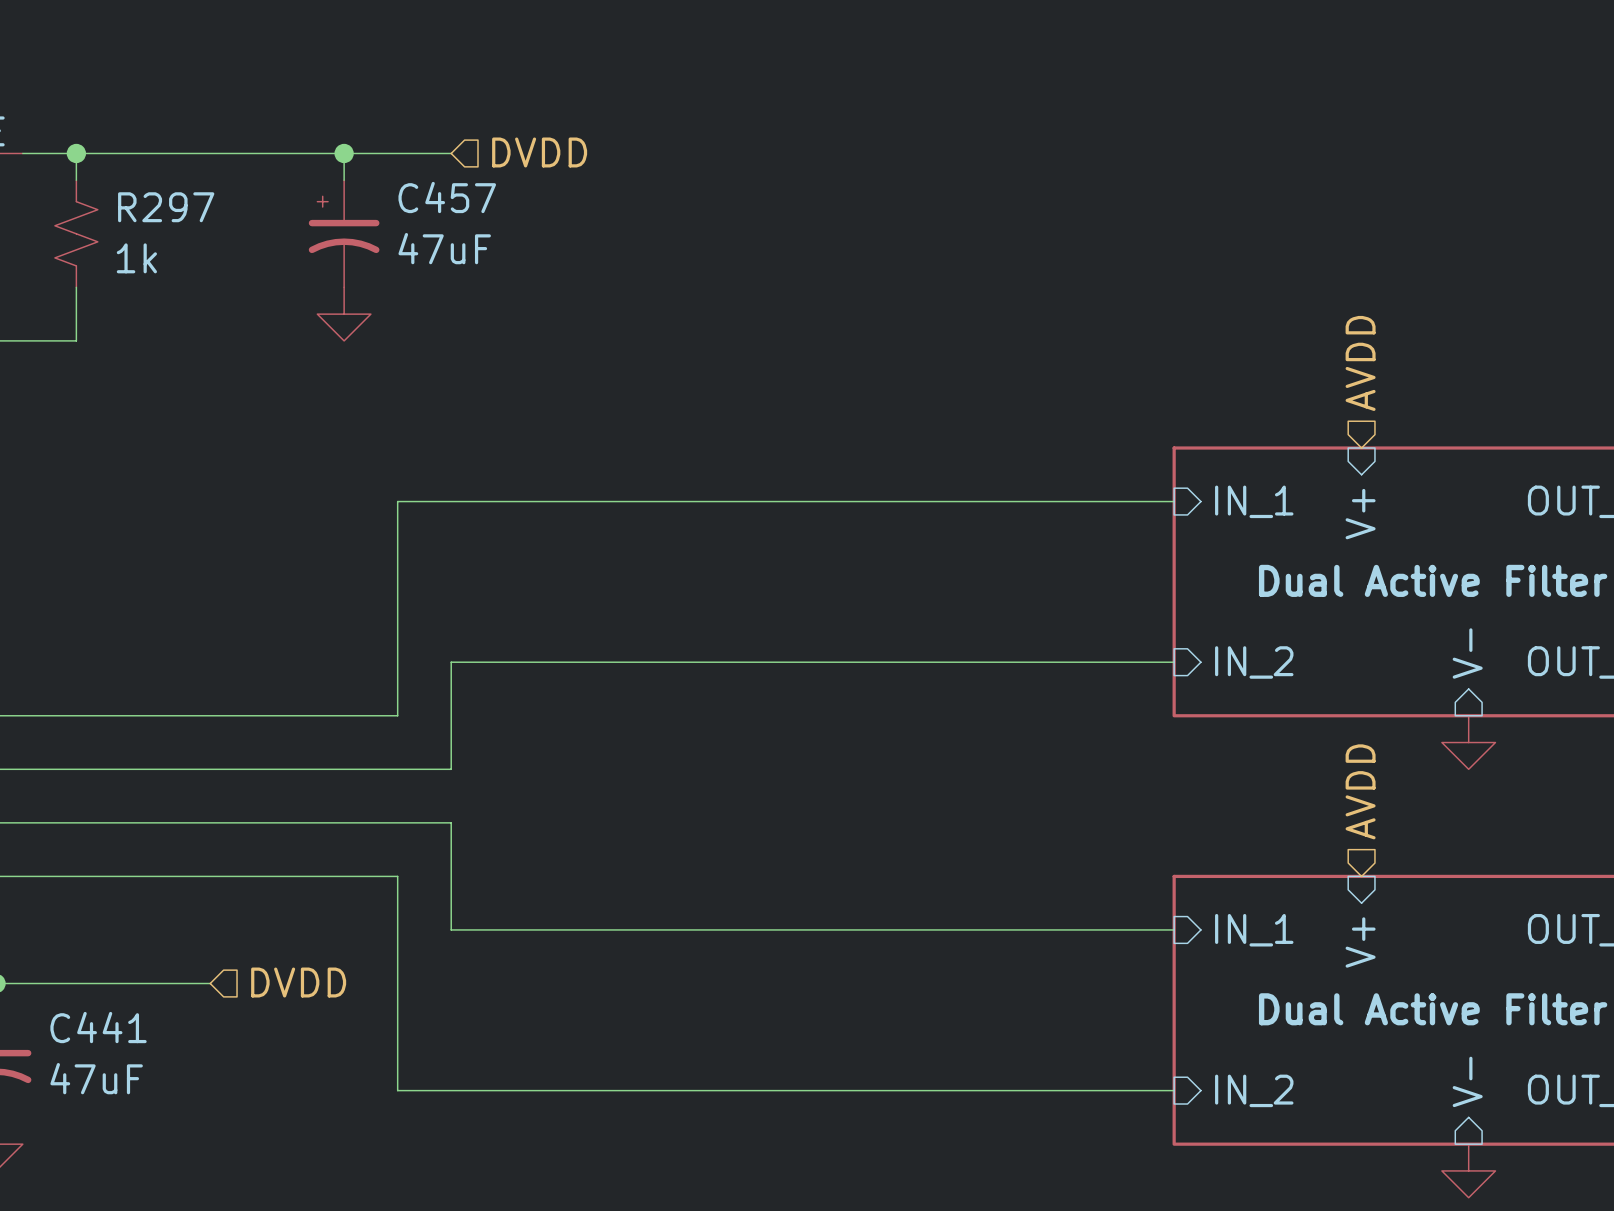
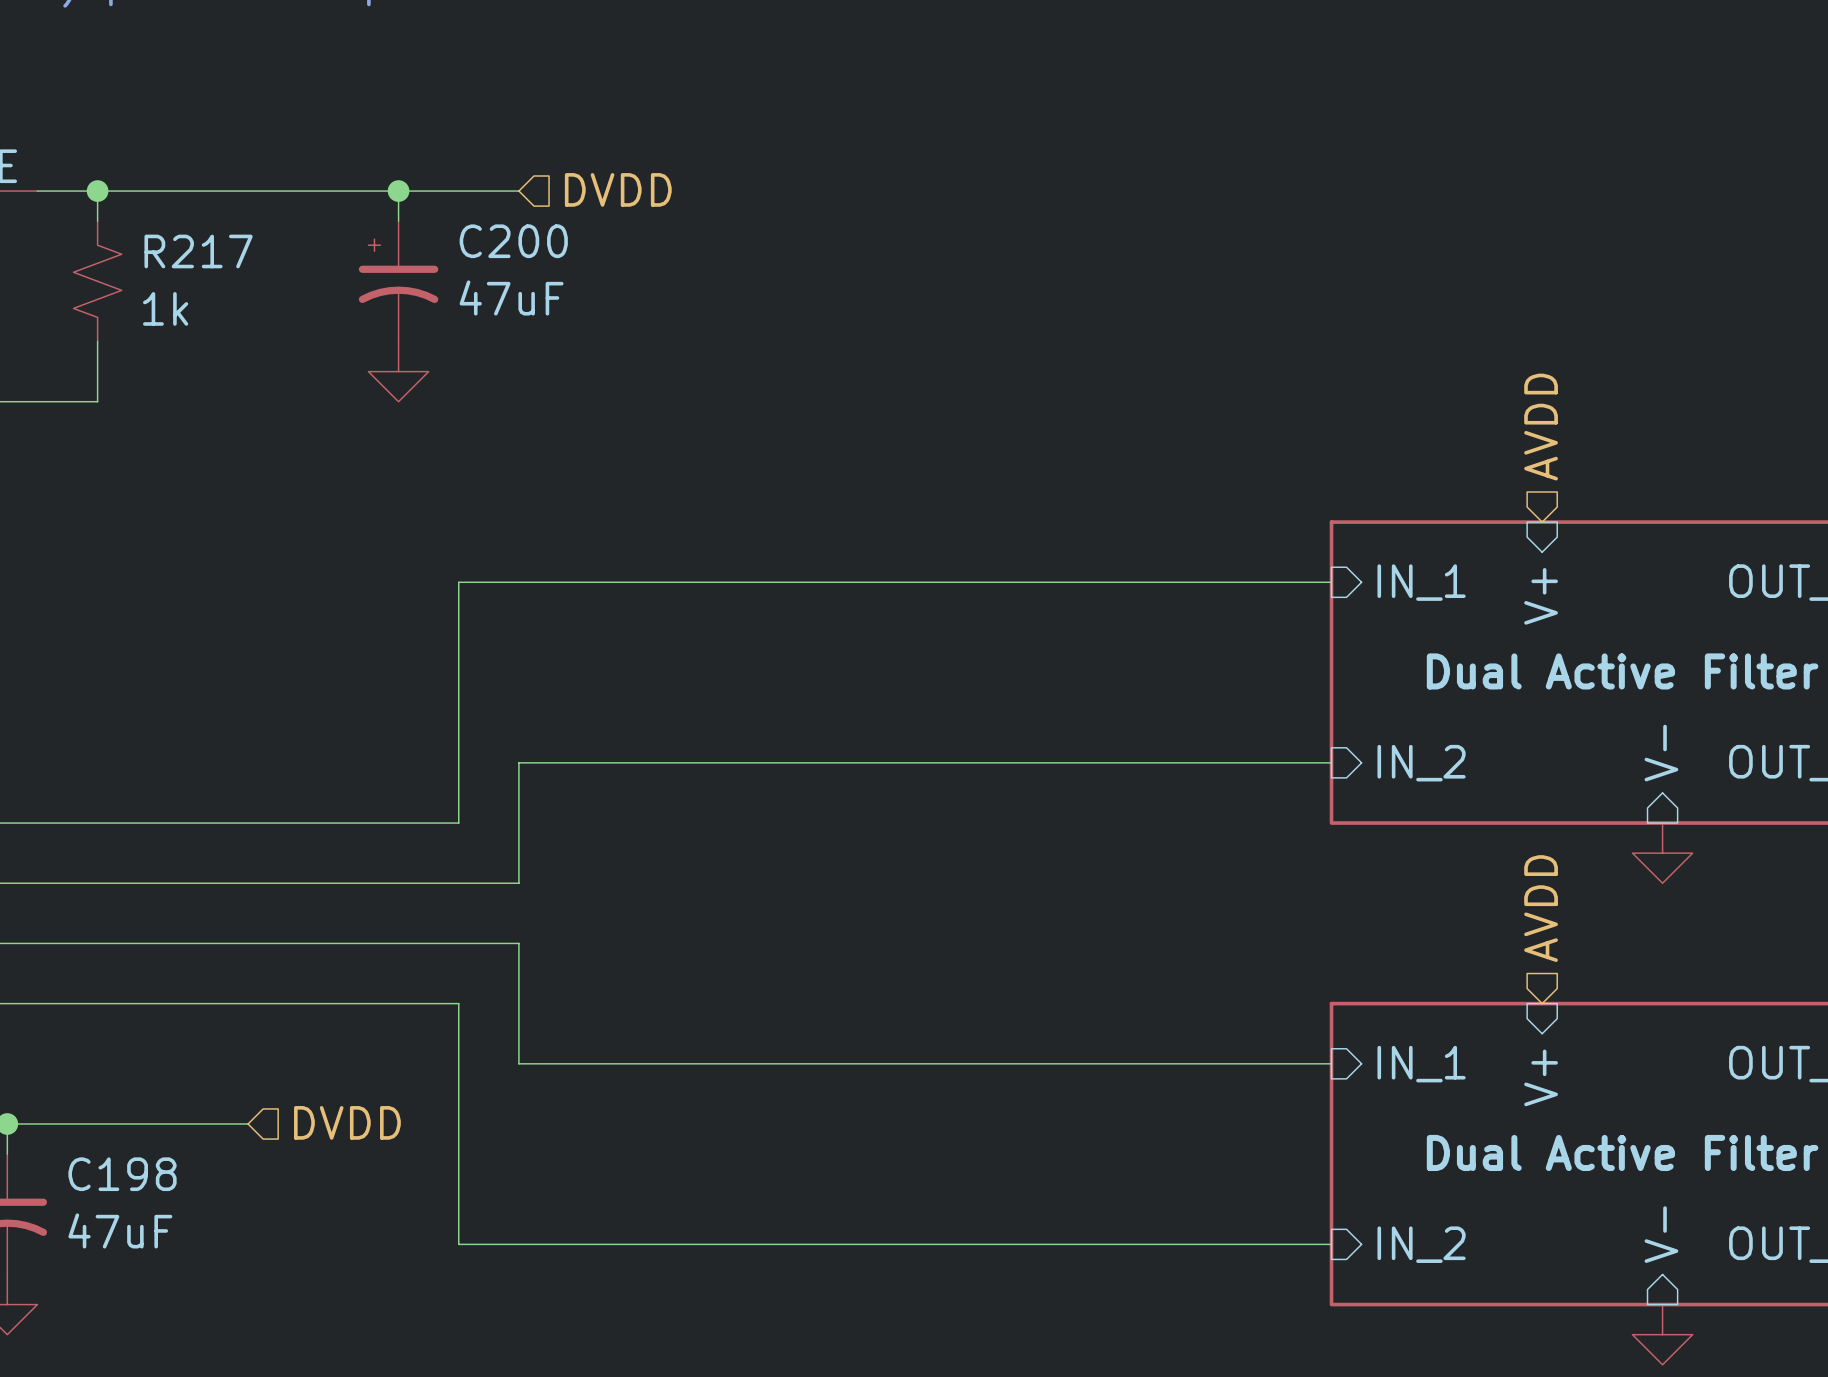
C457 name: C457 (447, 197) -> C200 (513, 241)
R297 name: R297 (166, 207) -> R217 (198, 251)
C441 name: C441 (98, 1027) -> C198 (122, 1174)

